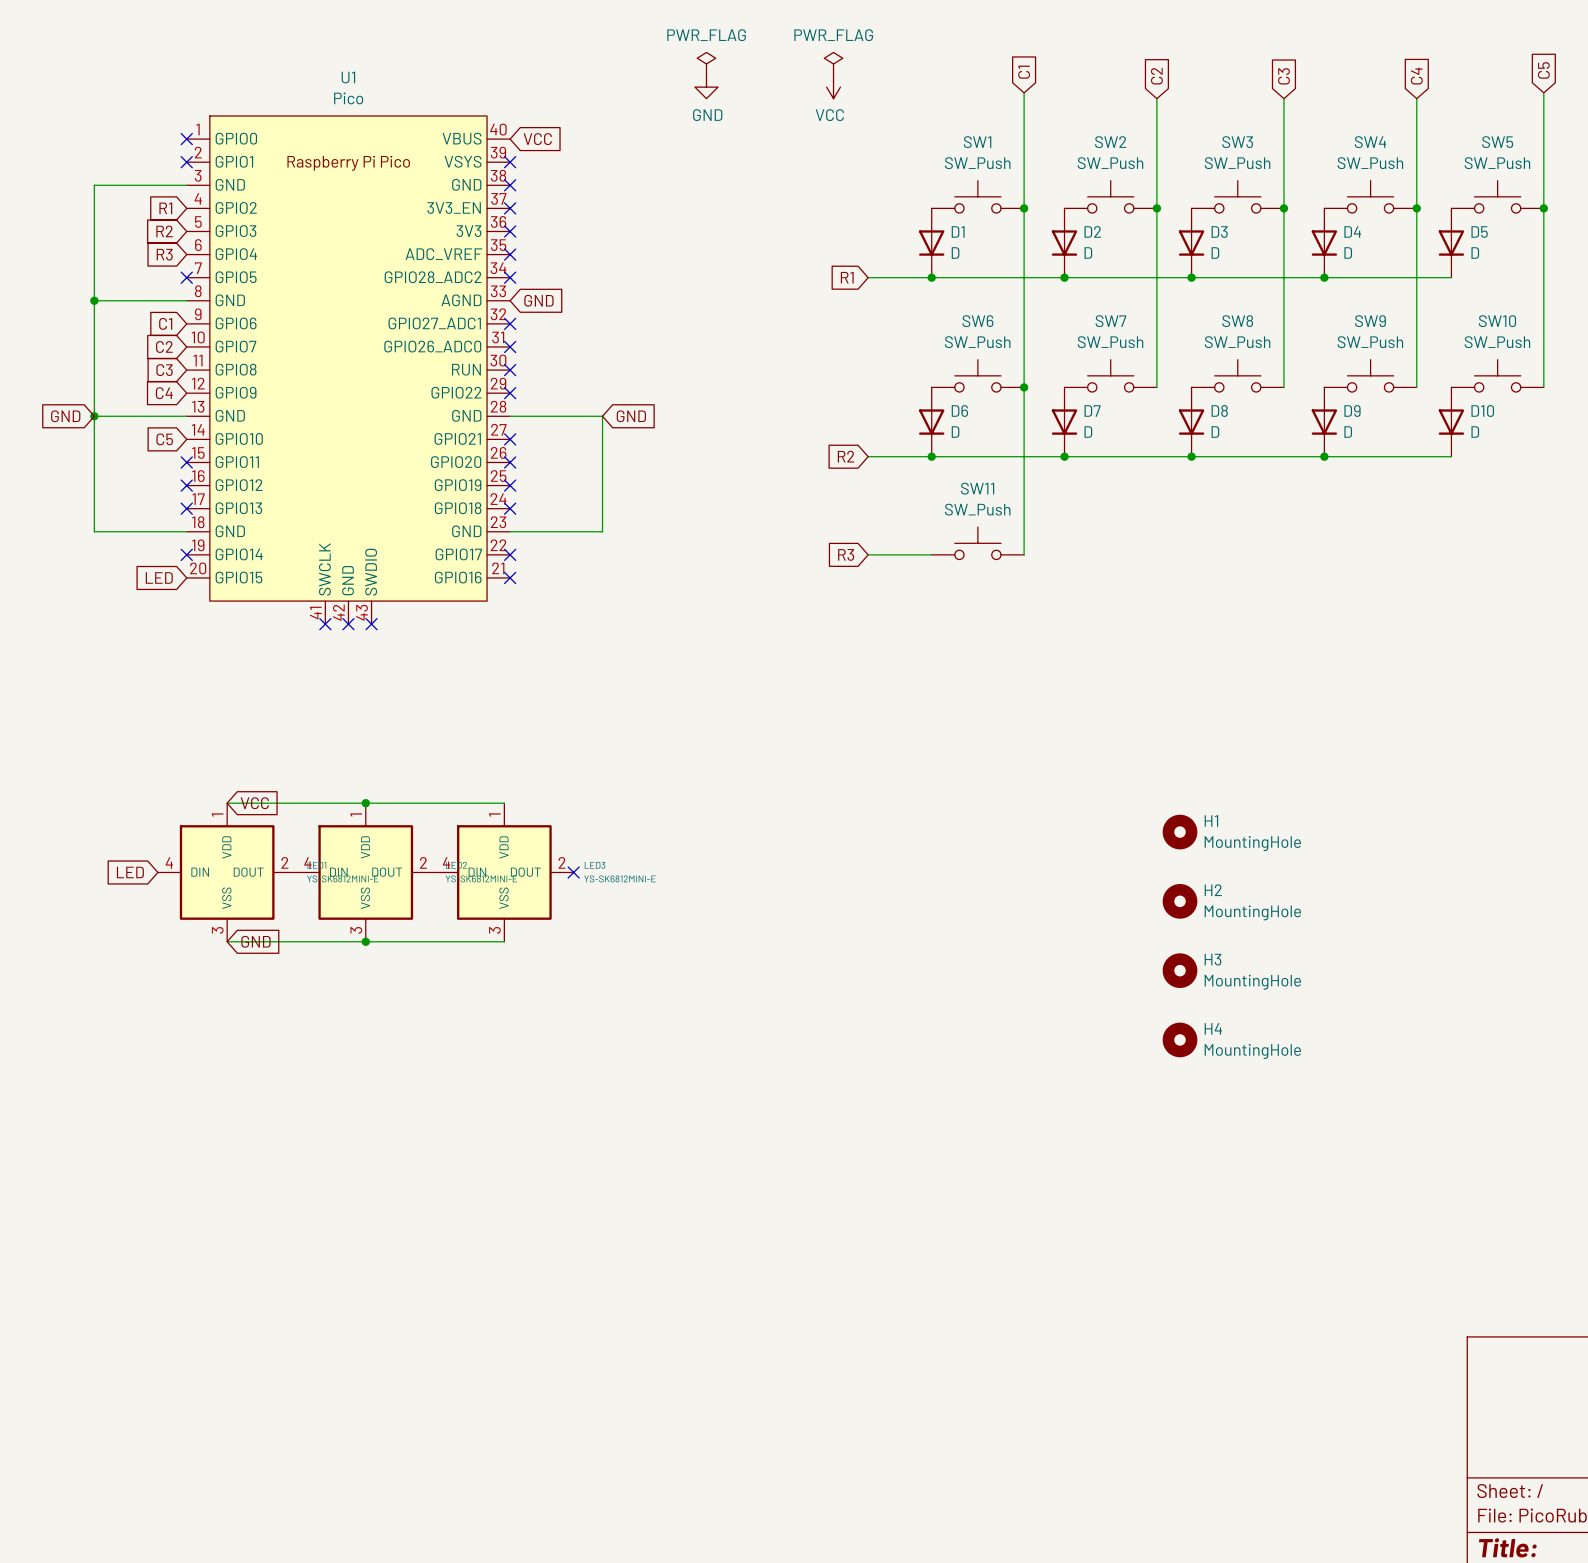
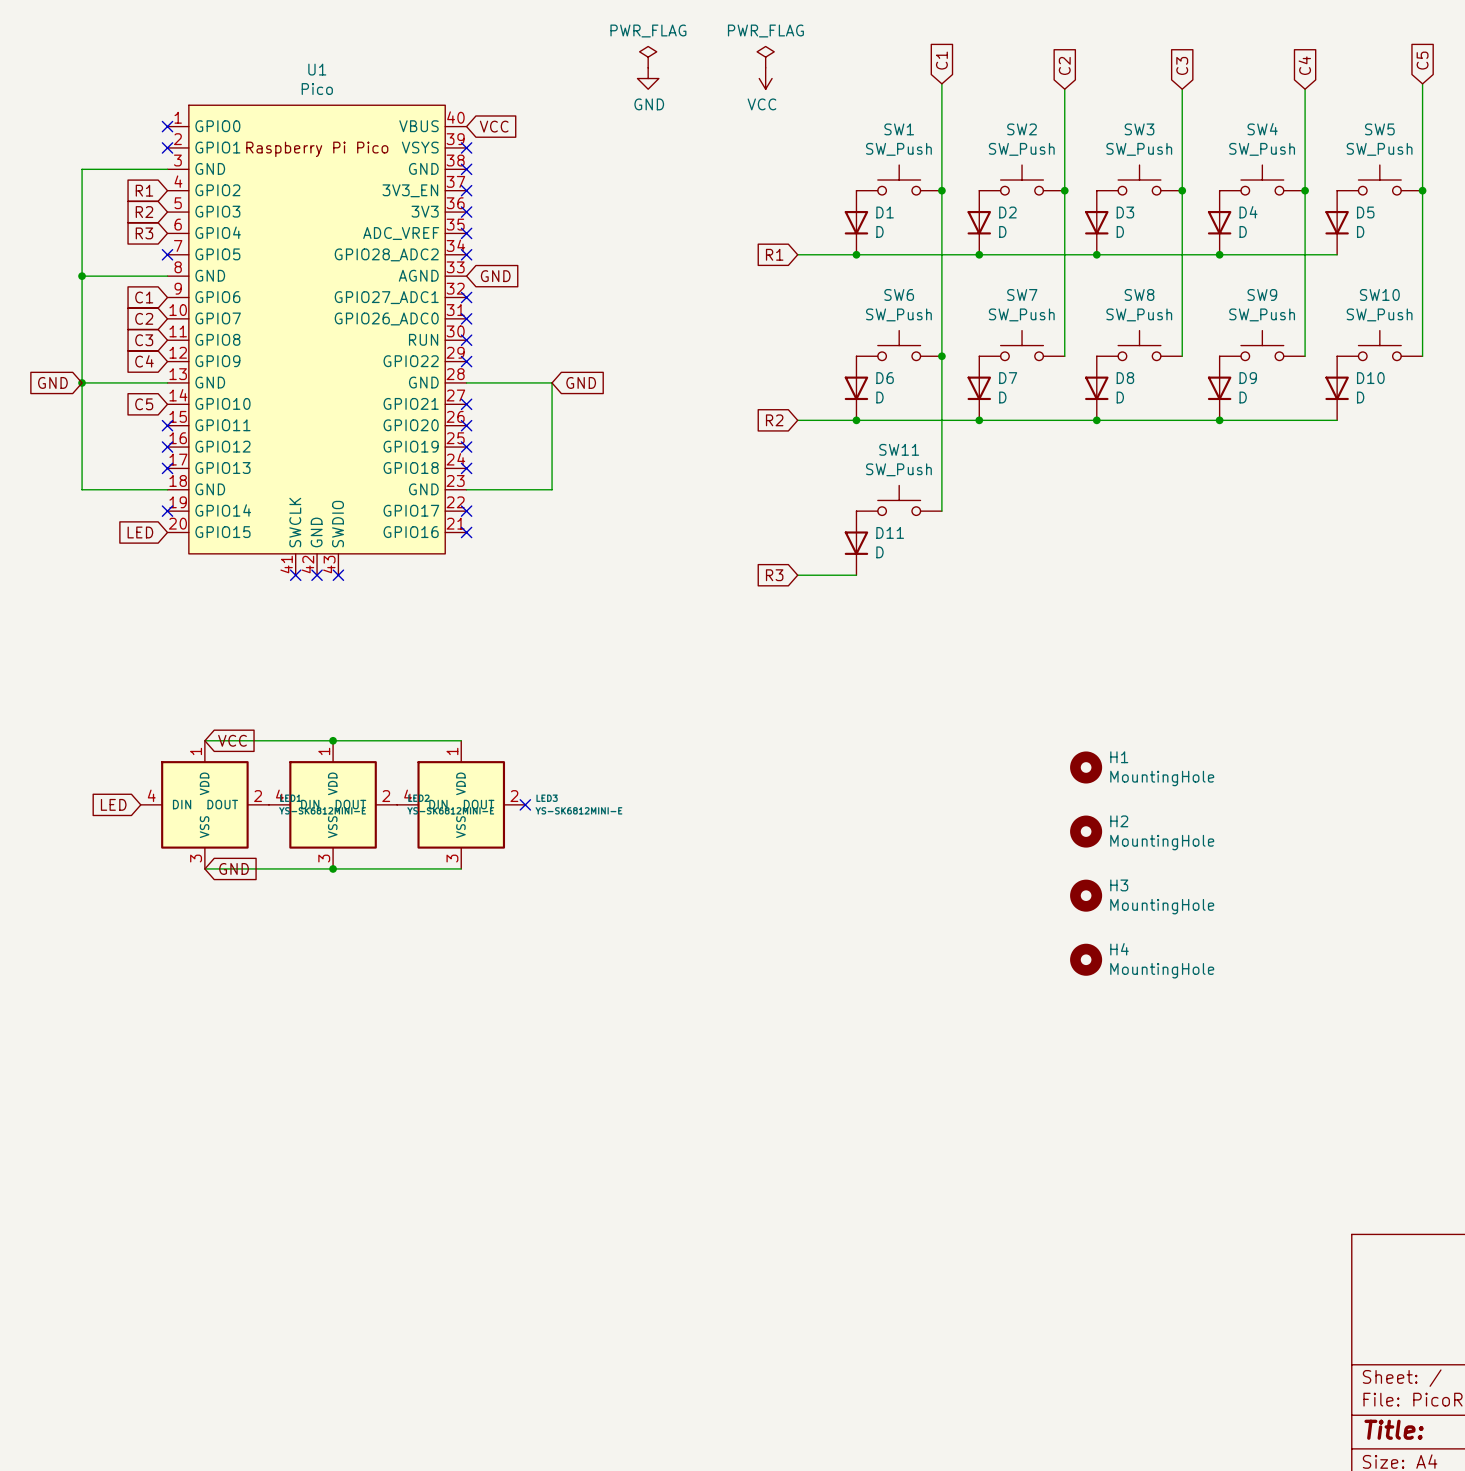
global label position: R3 (846, 554) -> R3 (774, 575)
wire: (868, 554) (931, 554) -> (797, 575) (856, 575)
D11: none -> D (856, 543)

